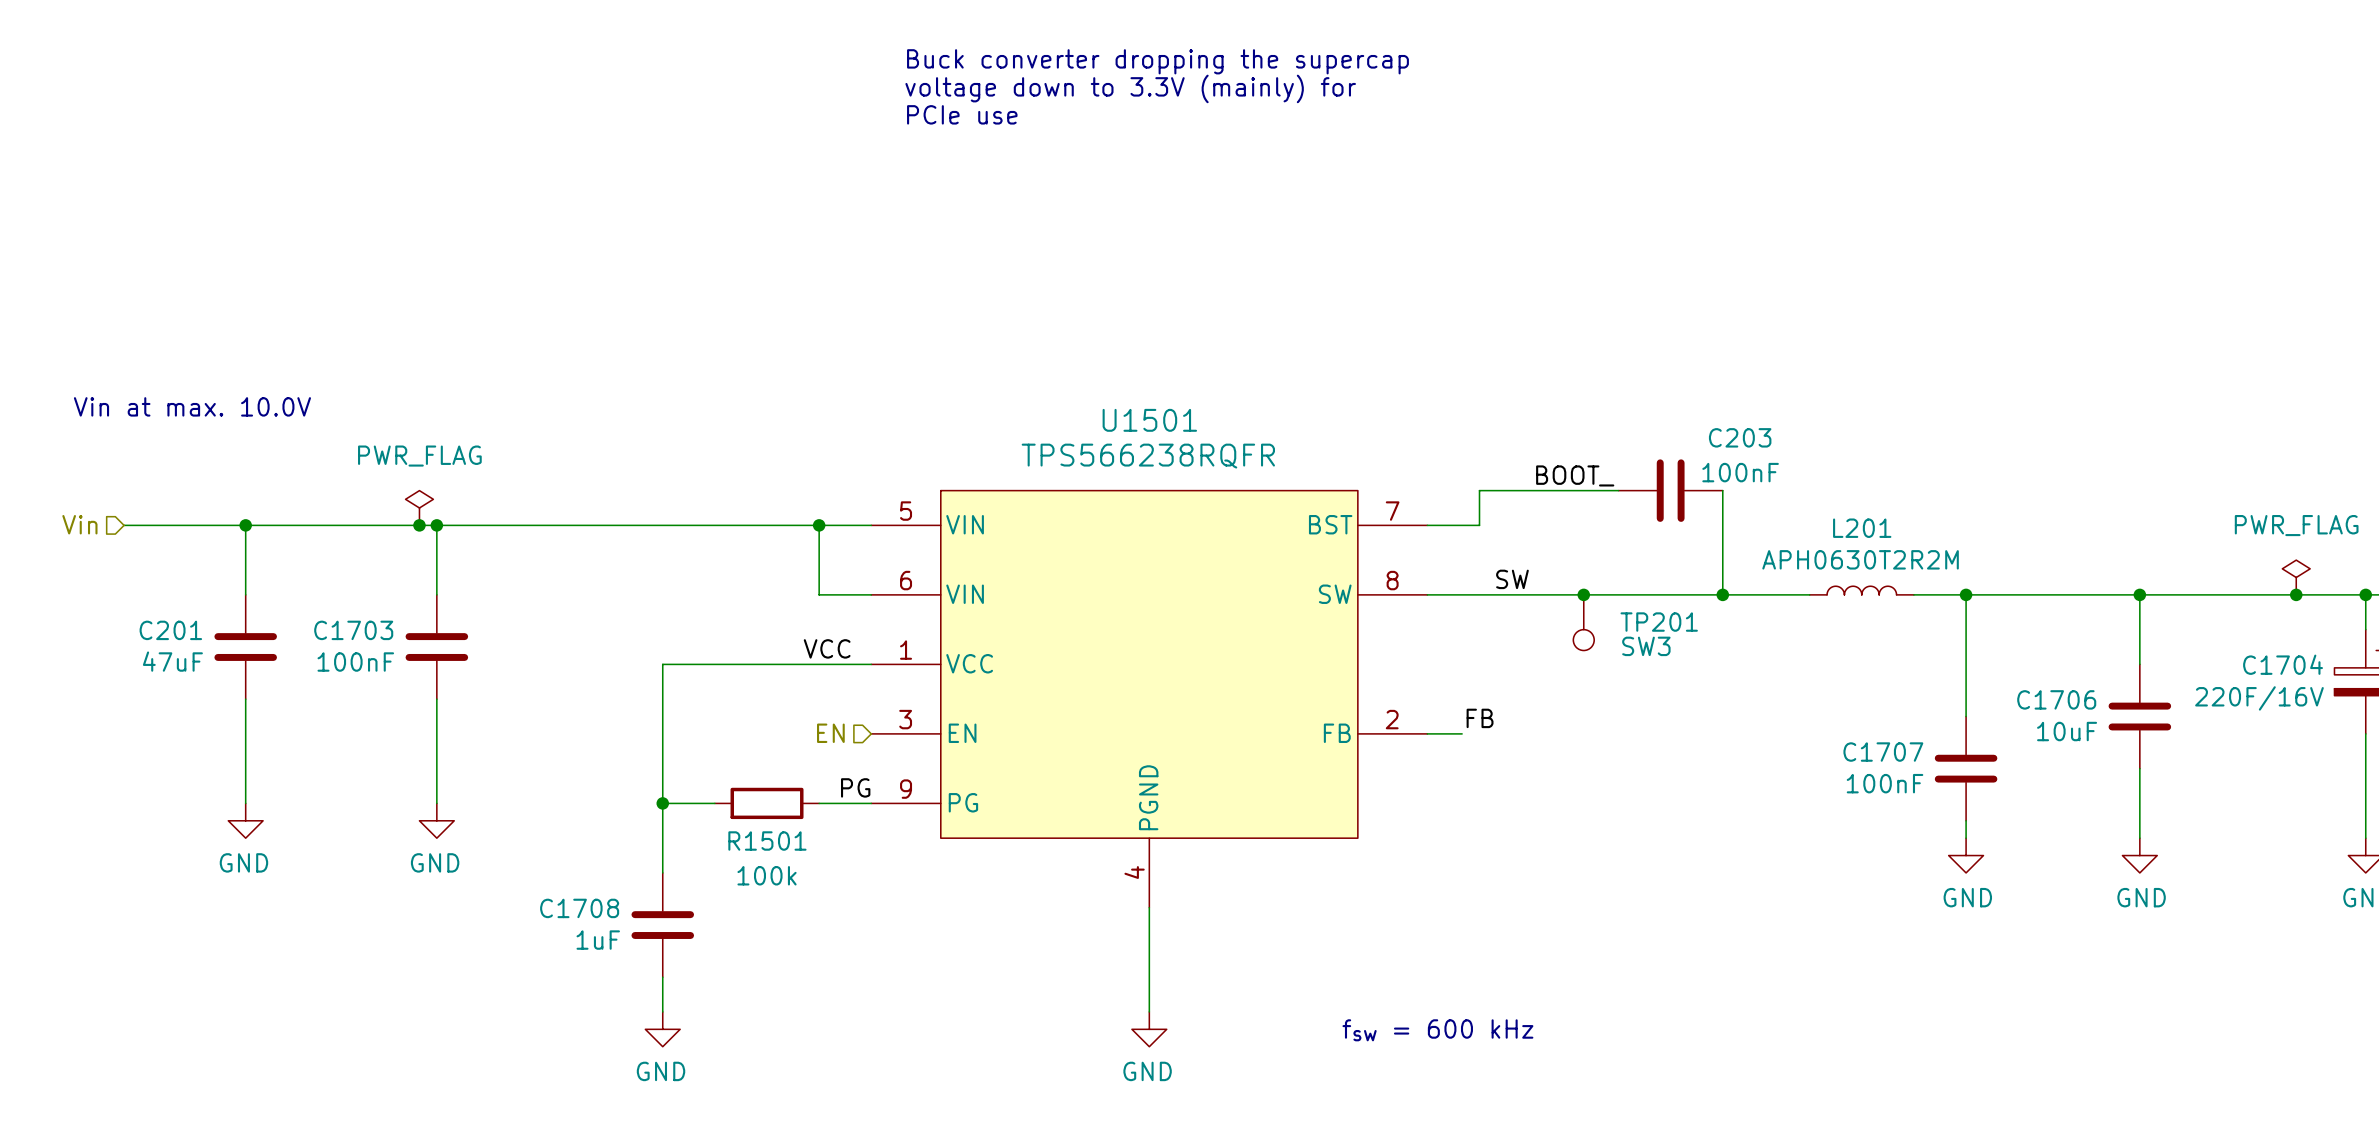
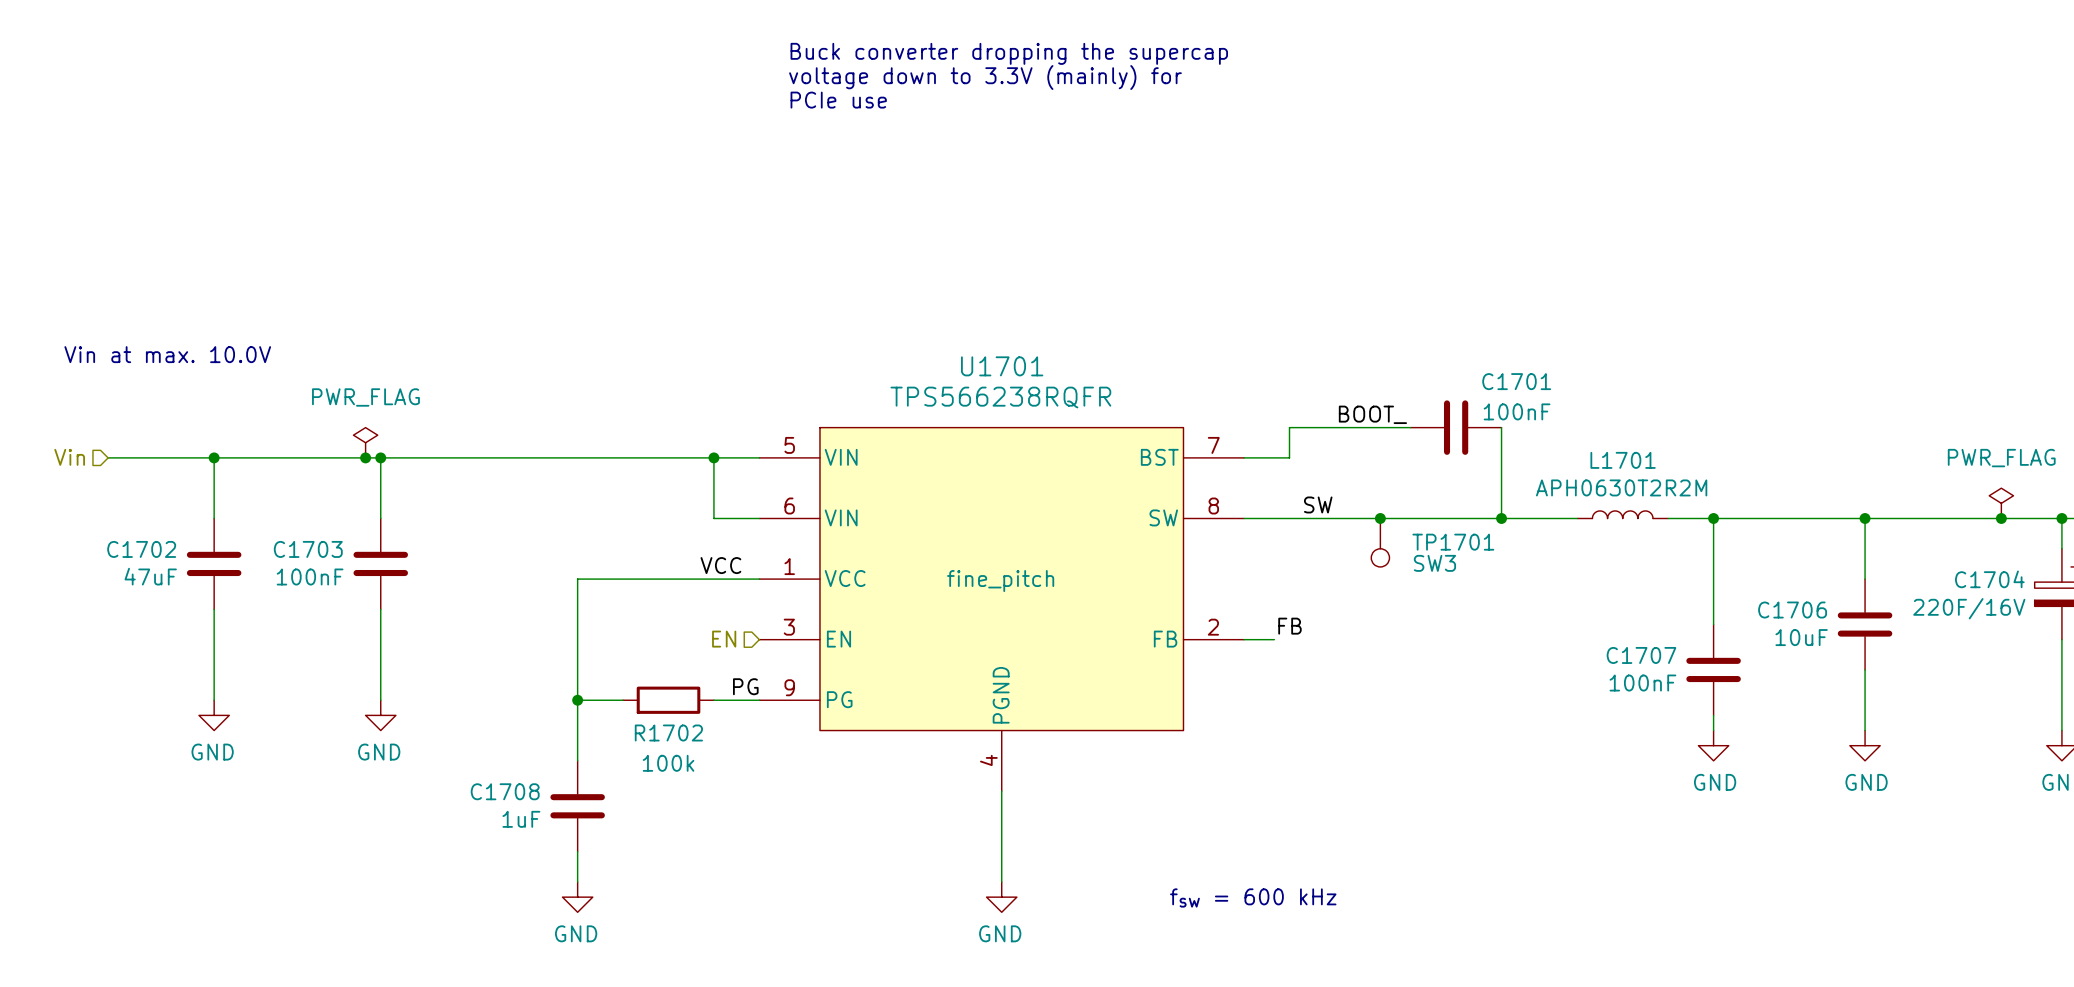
U1501 name: U1501 (1149, 420) -> U1701 (1002, 366)
C203 name: C203 (1740, 437) -> C1701 (1516, 381)
L201 name: L201 (1862, 528) -> L1701 (1623, 460)
TP201 name: TP201 (1659, 622) -> TP1701 (1453, 542)
C201 name: C201 (170, 630) -> C1702 (141, 549)
U1501 text: none -> fine_pitch (1000, 581)
R1501 name: R1501 (767, 841) -> R1702 (668, 733)

